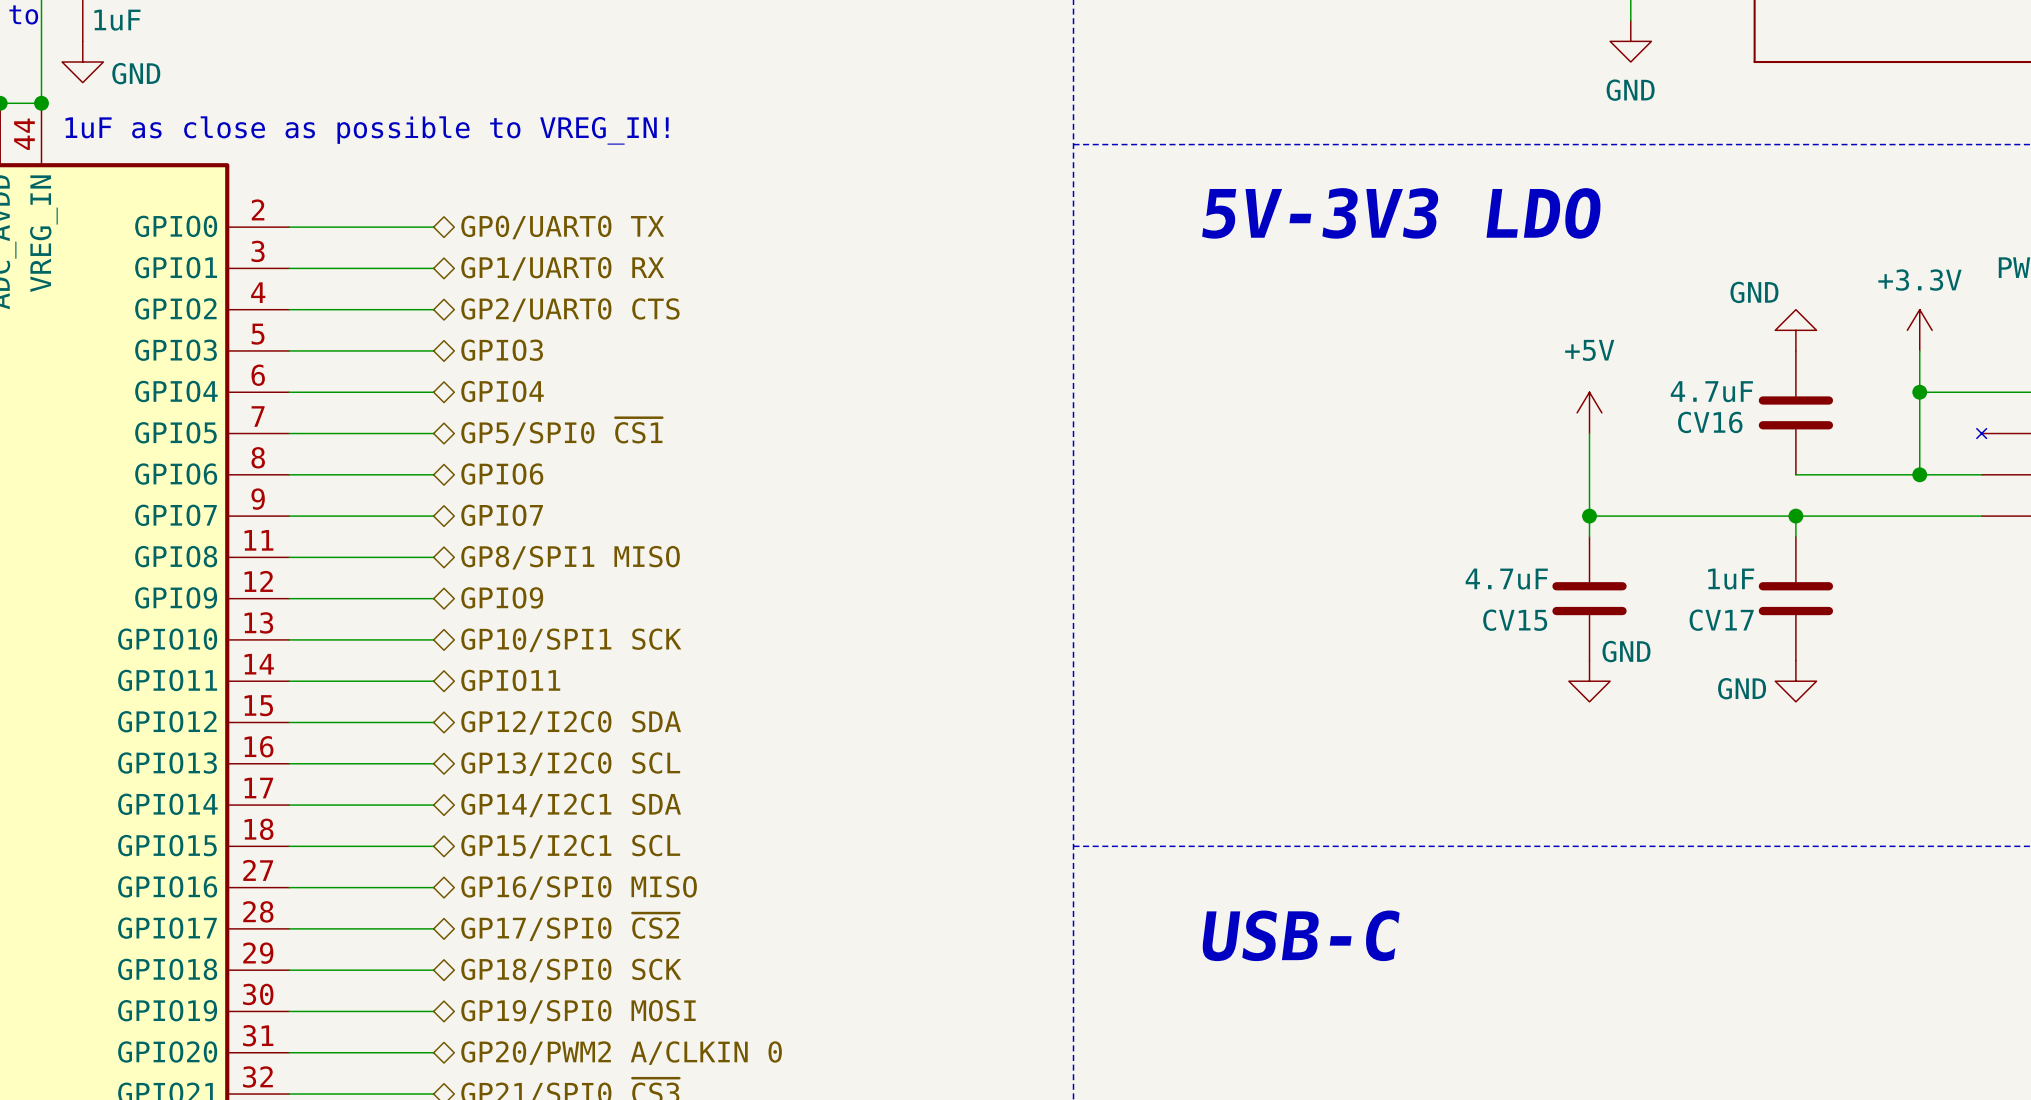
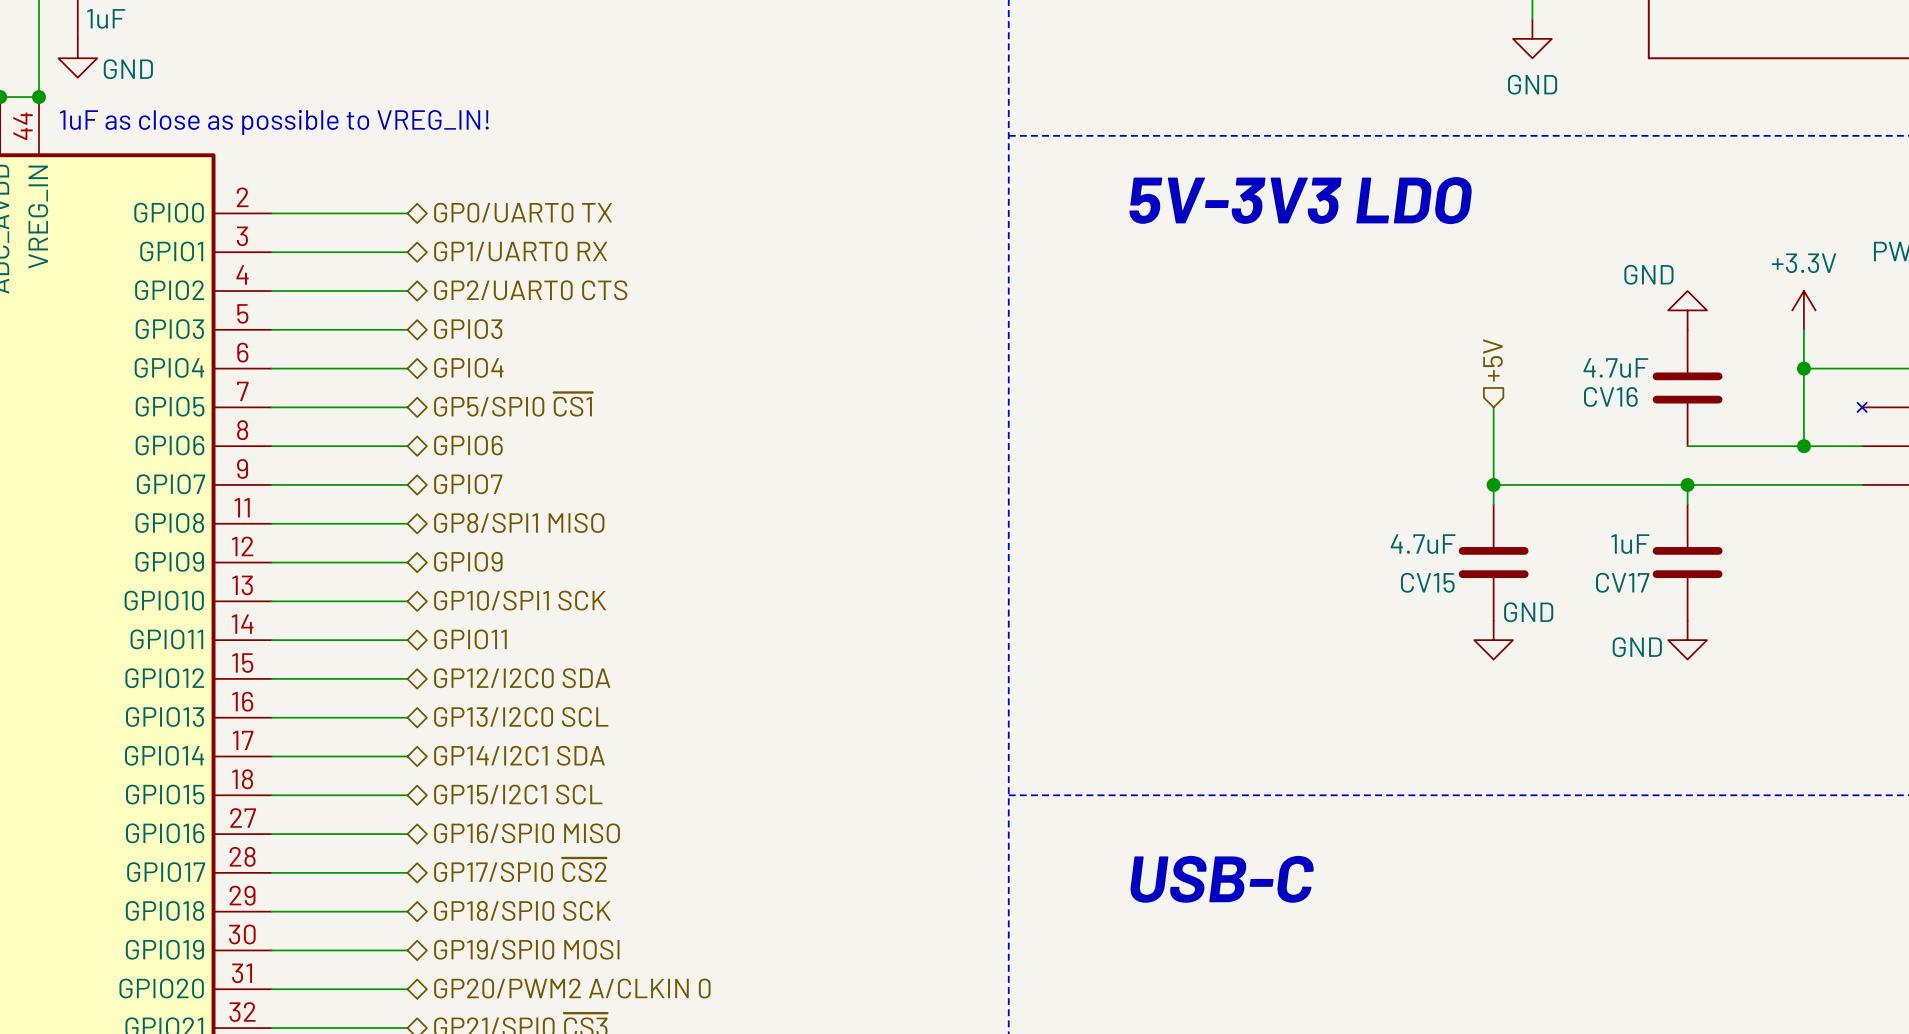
hierarchical label: none -> +5V (1493, 360)
power symbol: +5V (1589, 412) -> none

